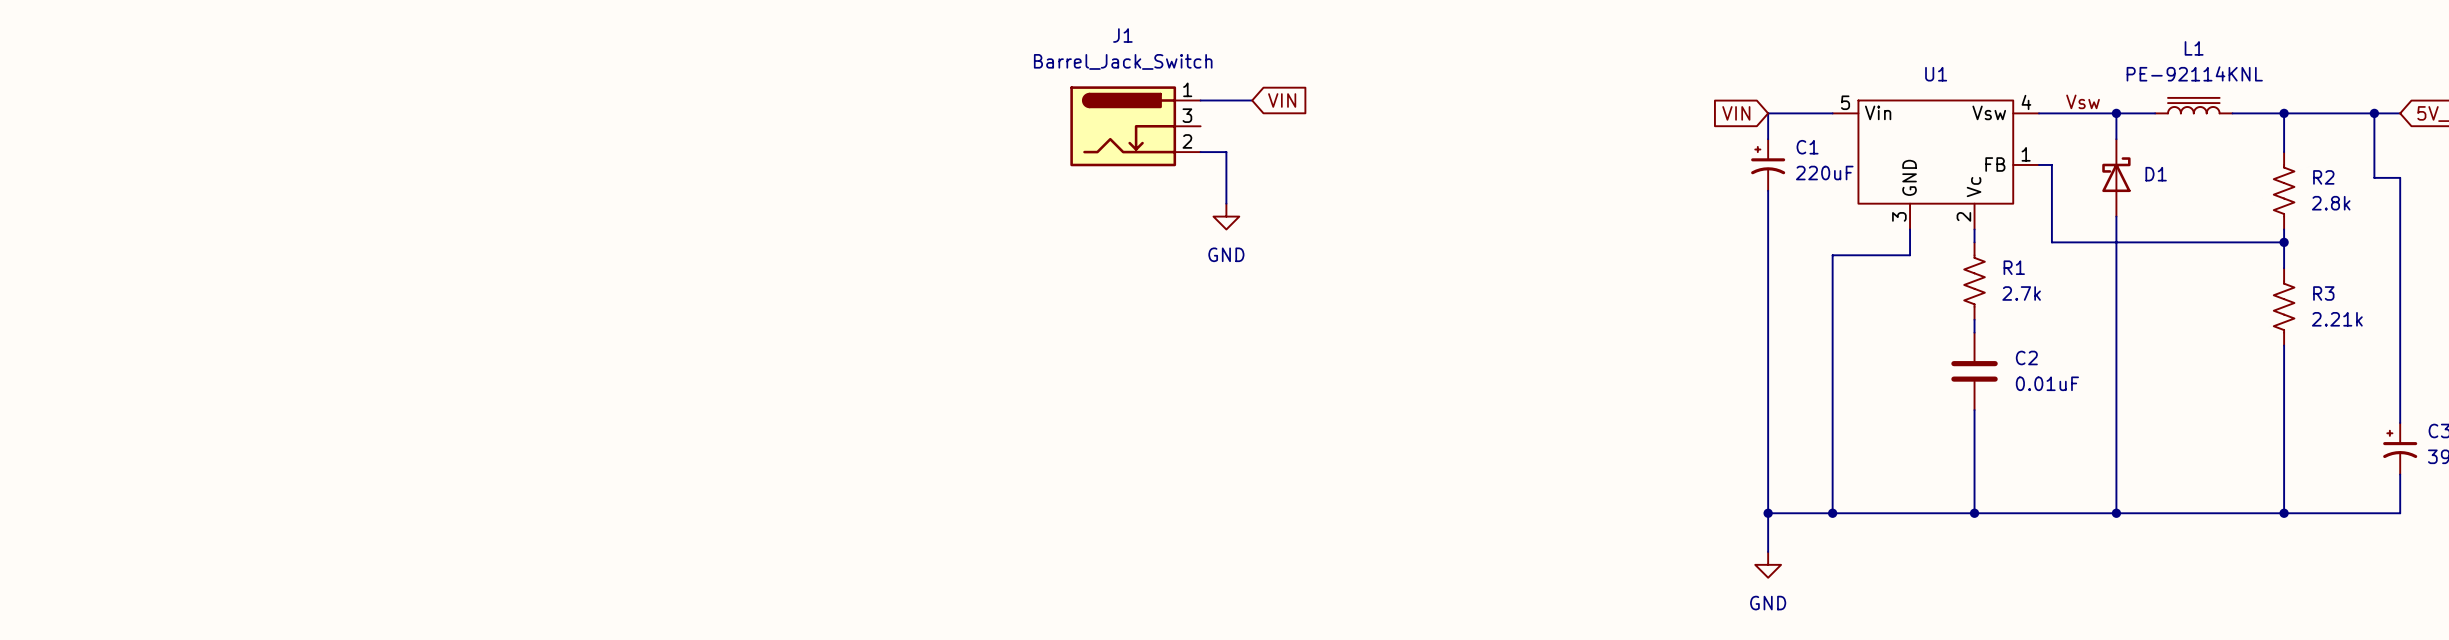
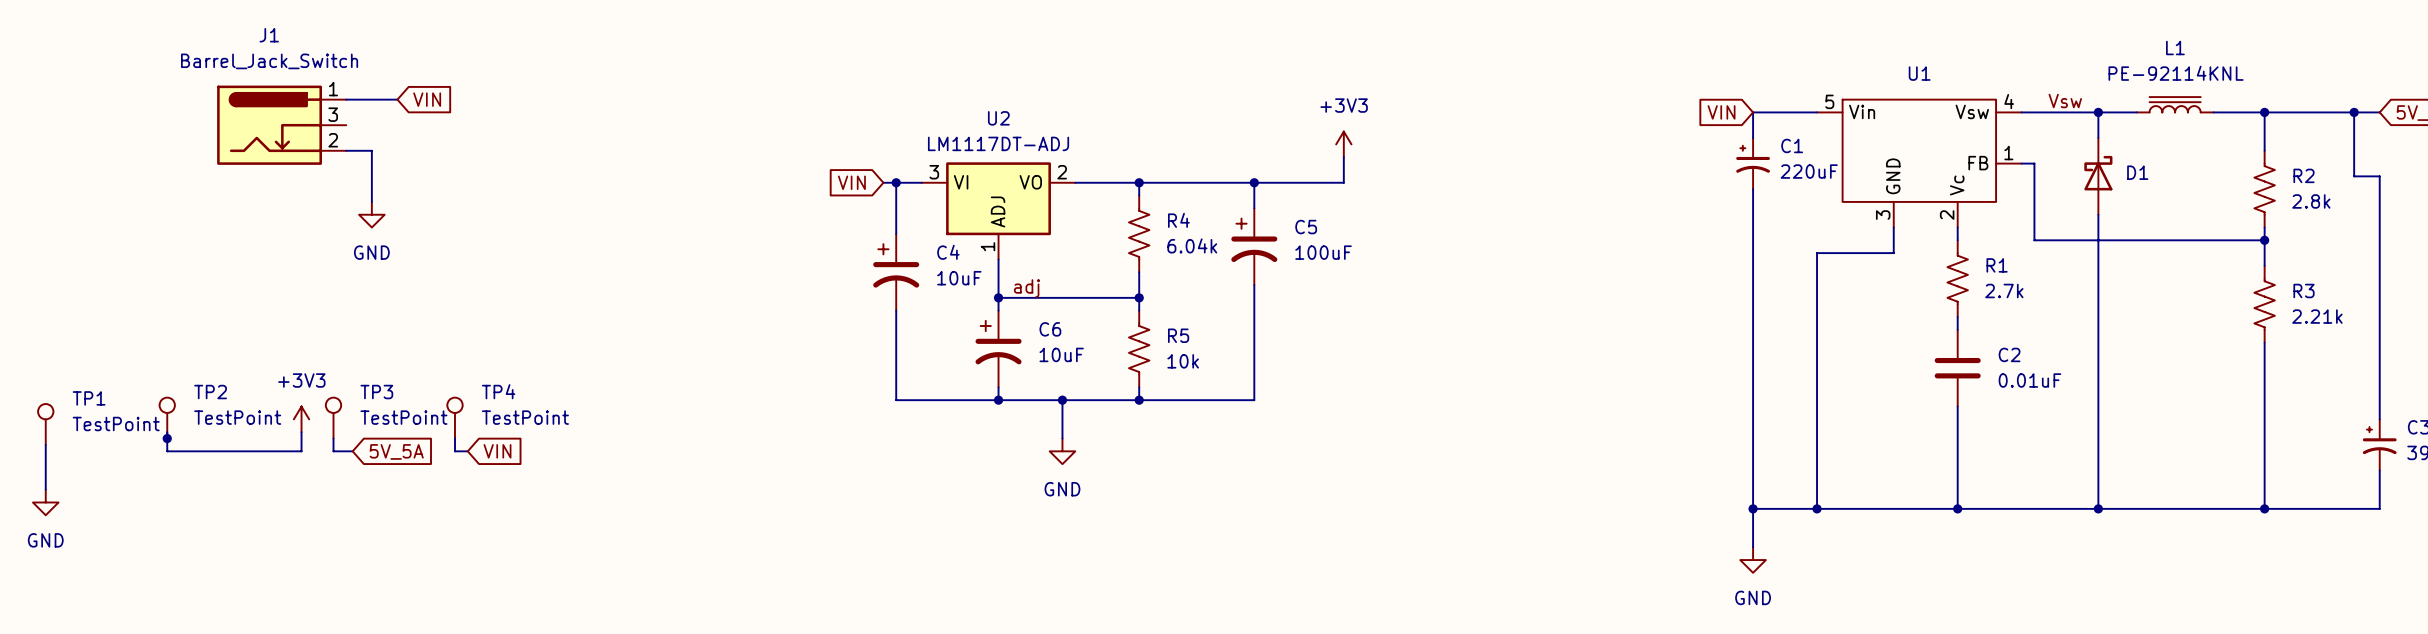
wire: none -> (346, 99) (397, 99)
global label: none -> VIN (427, 99)
wire: (1200, 100) (1252, 100) -> none
global label: VIN (1282, 100) -> none
J1 position: (1135, 126) -> (281, 125)
power symbol: none -> +3V3 (1343, 144)
wire: none -> (346, 150) (371, 150) (371, 201)
wire: (1200, 152) (1226, 152) (1226, 203) -> none
wire: none -> (1343, 157) (1343, 182) (1075, 182)
global label: none -> VIN (851, 182)
wire: none -> (883, 182) (921, 182)
wire: none -> (896, 182) (896, 233)
junction: none -> (896, 182)
wire: none -> (1139, 182) (1139, 195)
junction: none -> (1139, 182)
wire: none -> (1254, 182) (1254, 208)
junction: none -> (1254, 182)
U2: none -> LM1117DT-ADJ (998, 210)
power symbol: none -> GND (371, 214)
power symbol: GND (1226, 216) -> none
R4: none -> 6.04k (1139, 233)
C5: none -> 100uF (1254, 246)
wire: none -> (998, 259) (998, 310)
C4: none -> 10uF (896, 272)
wire: none -> (1139, 272) (1139, 310)
wire: none -> (1254, 285) (1254, 400) (896, 400) (896, 310)
label: none -> adj (1026, 288)
wire: none -> (998, 297) (1139, 297)
junction: none -> (998, 297)
junction: none -> (1139, 297)
C6: none -> 10uF (998, 349)
R5: none -> 10k (1139, 349)
wire: none -> (998, 387) (998, 400)
wire: none -> (1139, 387) (1139, 400)
junction: none -> (998, 400)
wire: none -> (1062, 400) (1062, 438)
junction: none -> (1062, 400)
junction: none -> (1139, 400)
TP2: none -> TestPoint (167, 418)
TP3: none -> TestPoint (333, 418)
TP4: none -> TestPoint (455, 418)
power symbol: none -> +3V3 (301, 419)
TP1: none -> TestPoint (45, 424)
wire: none -> (167, 432) (167, 451) (301, 451) (301, 432)
junction: none -> (167, 438)
wire: none -> (333, 438) (333, 451) (352, 451)
wire: none -> (455, 438) (455, 451) (467, 451)
wire: none -> (45, 444) (45, 489)
global label: none -> 5V_5A (396, 451)
global label: none -> VIN (497, 451)
power symbol: none -> GND (1062, 451)
power symbol: none -> GND (45, 502)

